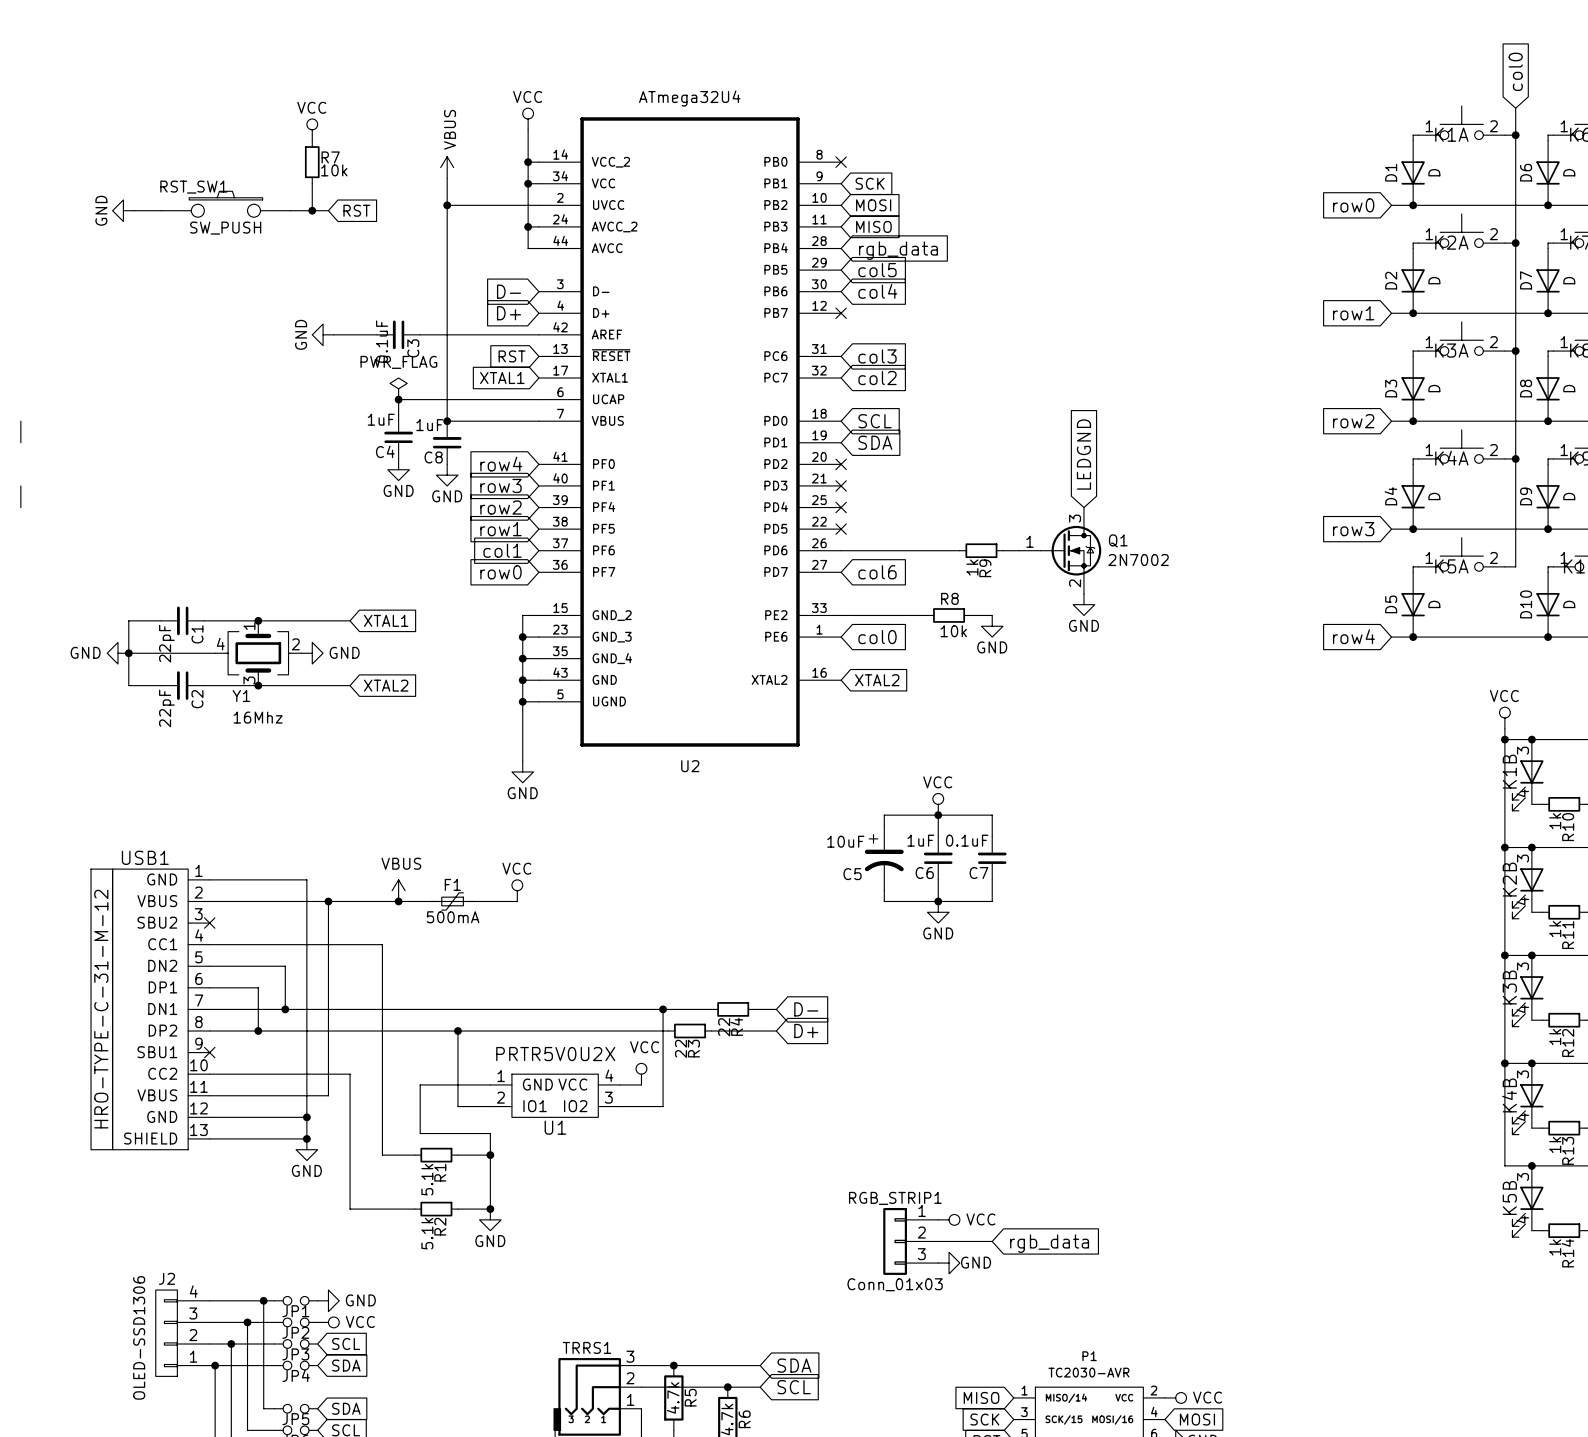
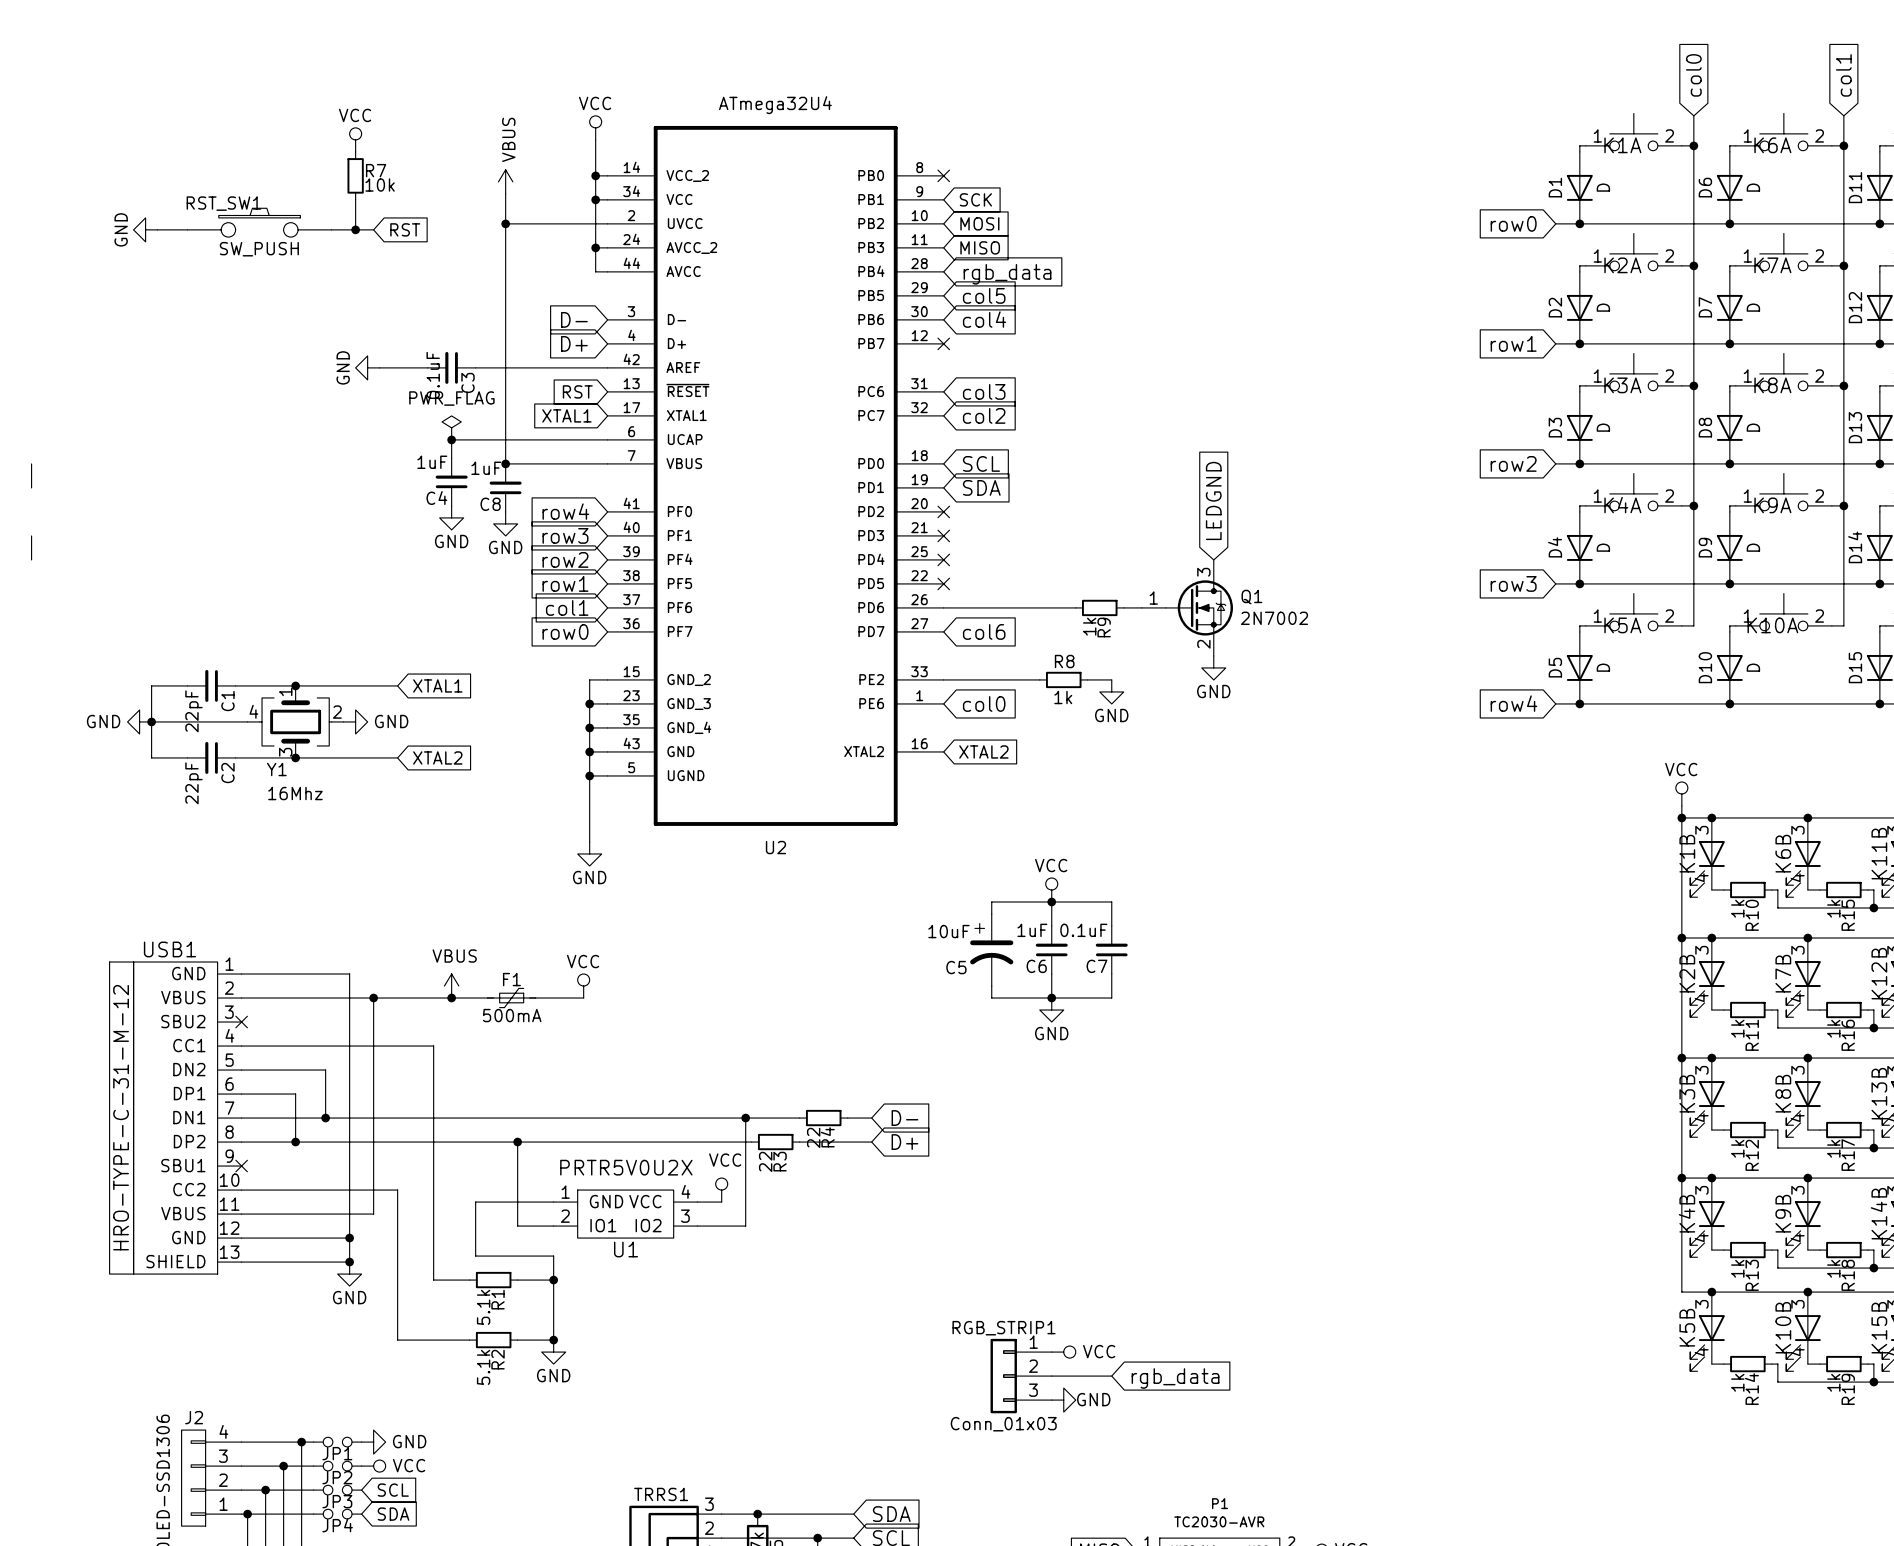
R8 value: 10k (953, 631) -> 1k (1063, 697)

